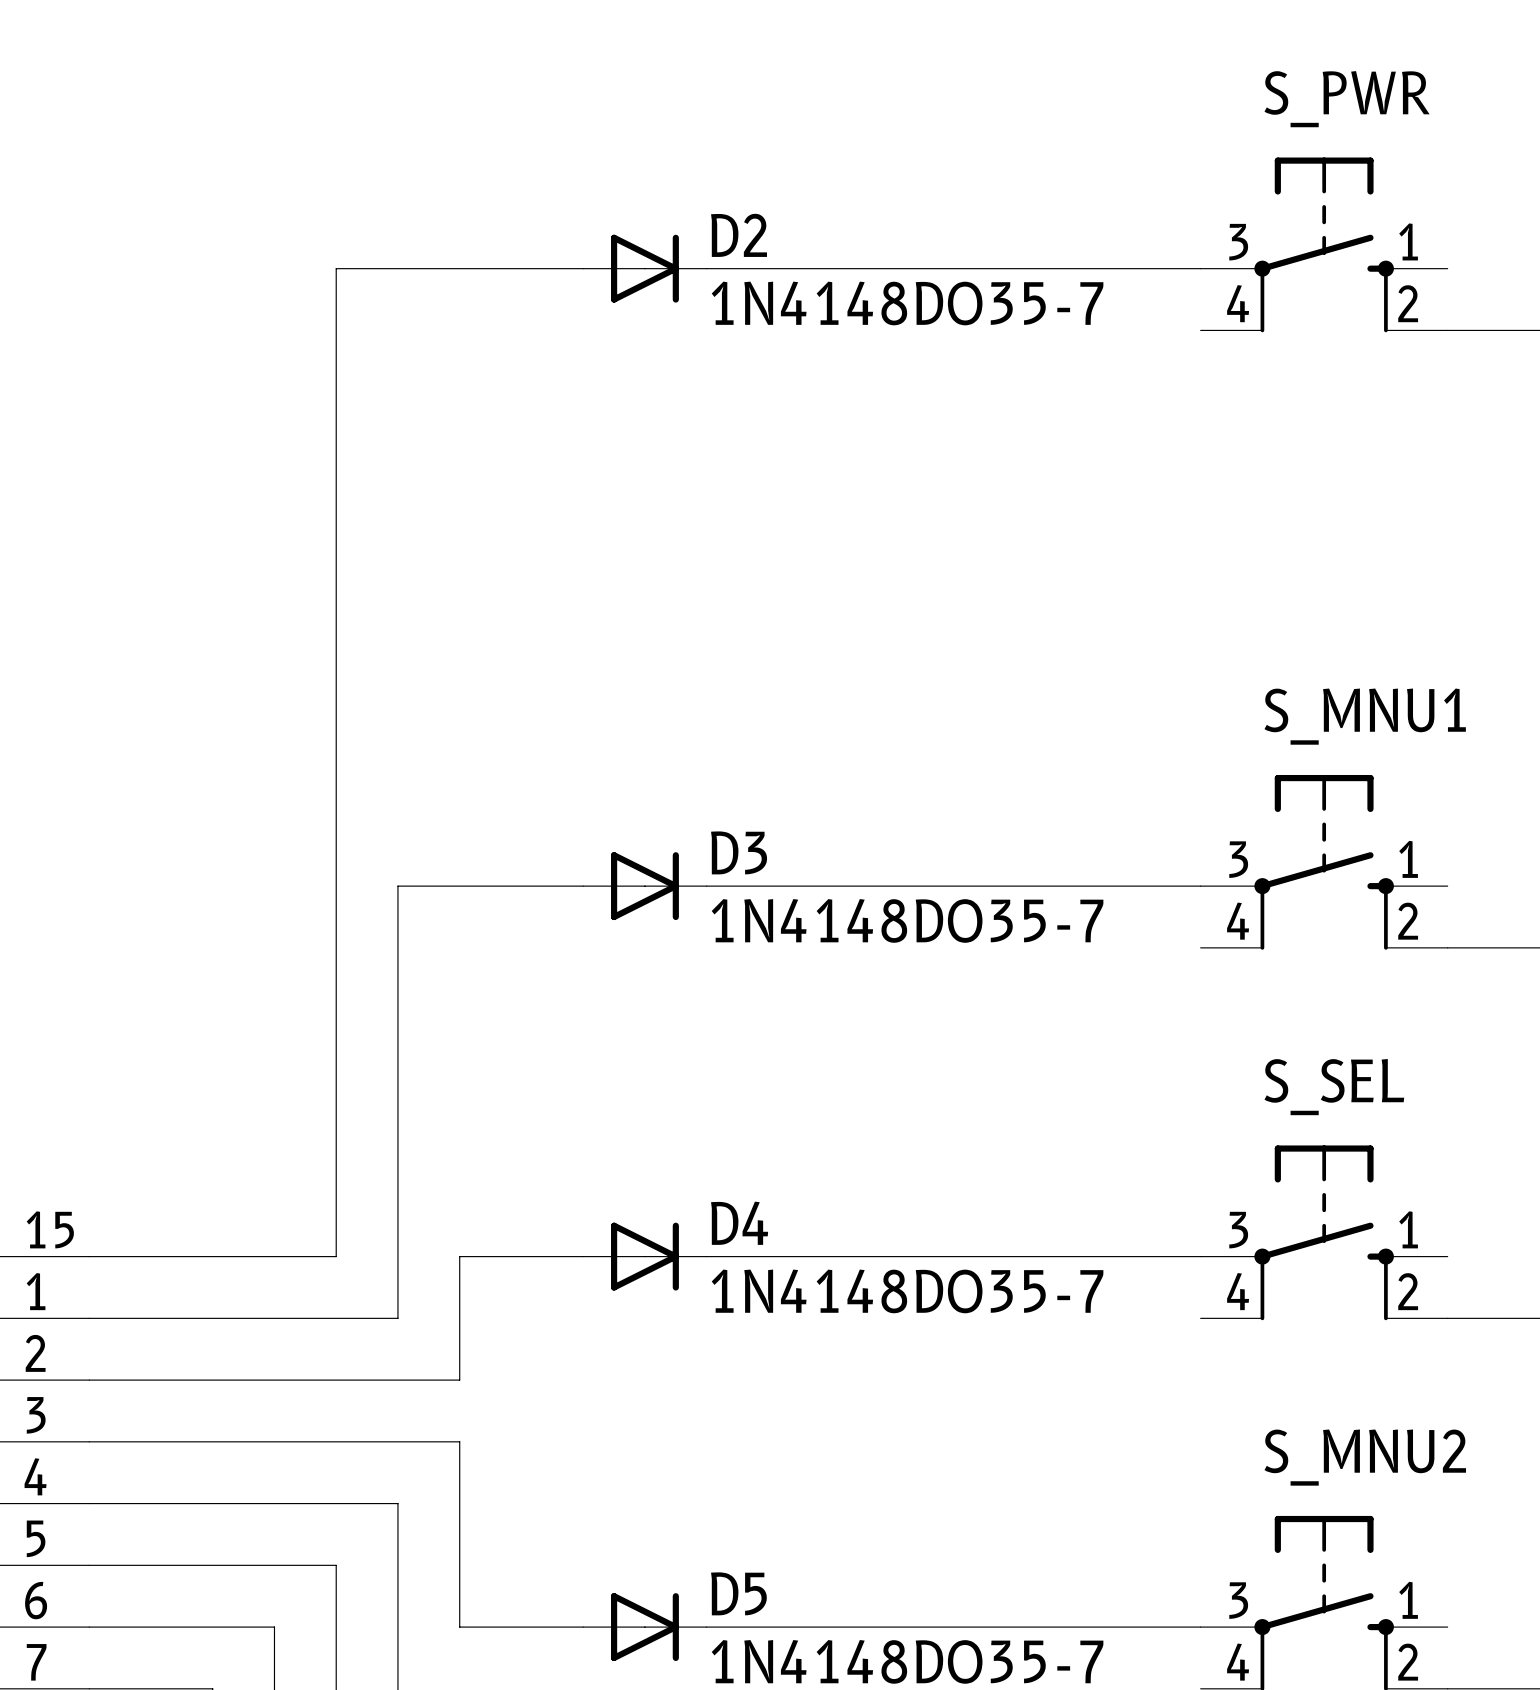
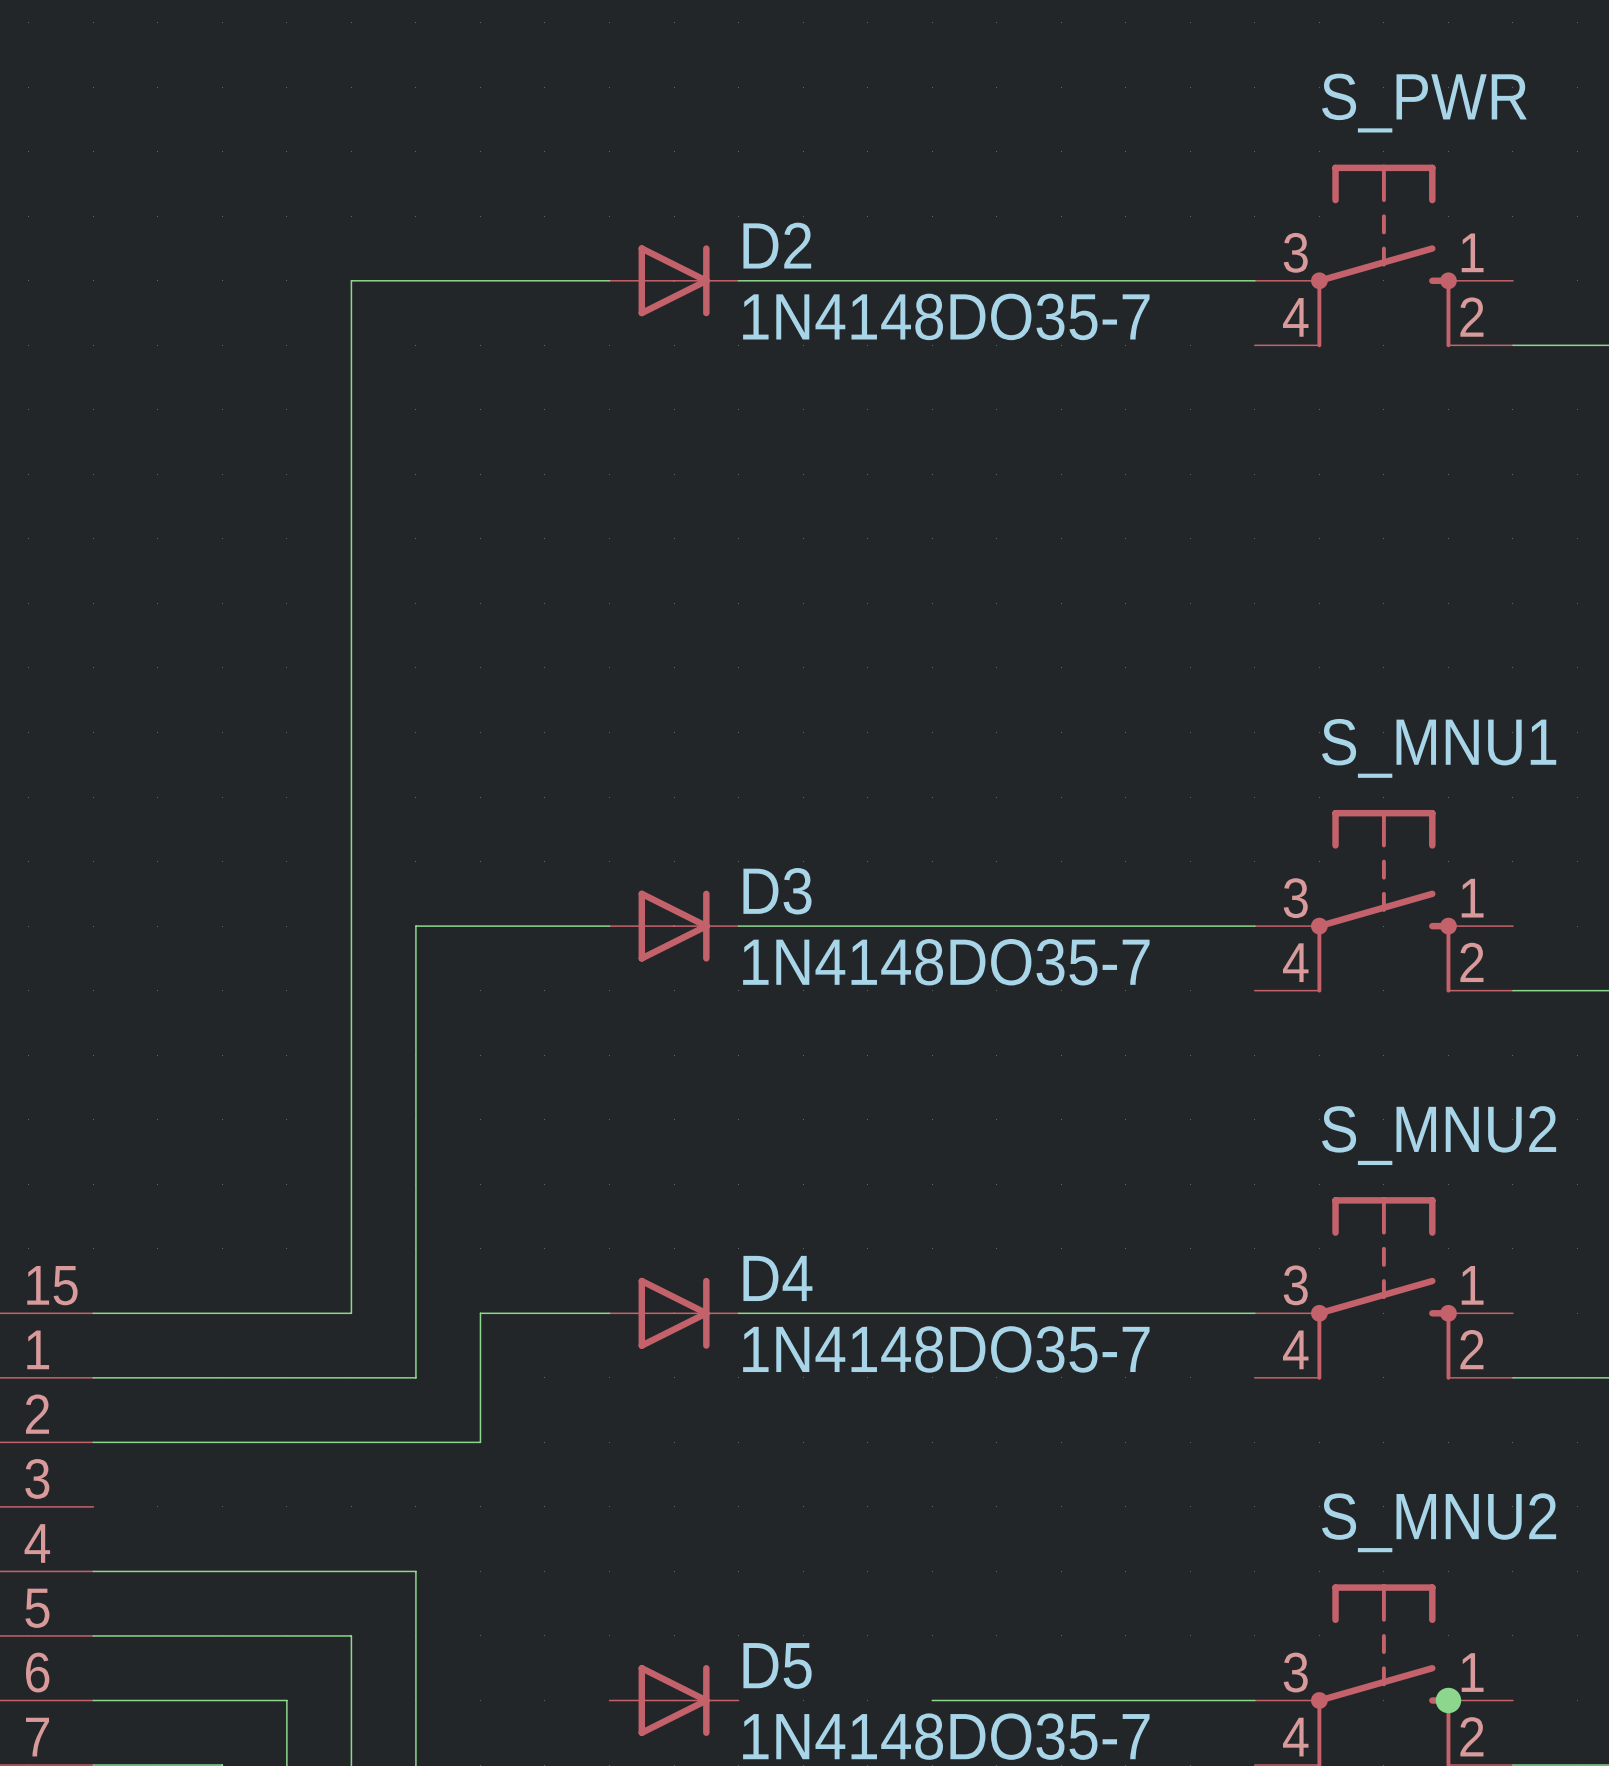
S_SEL name: S_SEL (1334, 1087) -> S_MNU2 (1439, 1135)
wire: (89, 1441) (459, 1441) (459, 1627) (583, 1627) -> none
wire: (706, 1627) (891, 1627) -> none
junction: none -> (1448, 1700)

